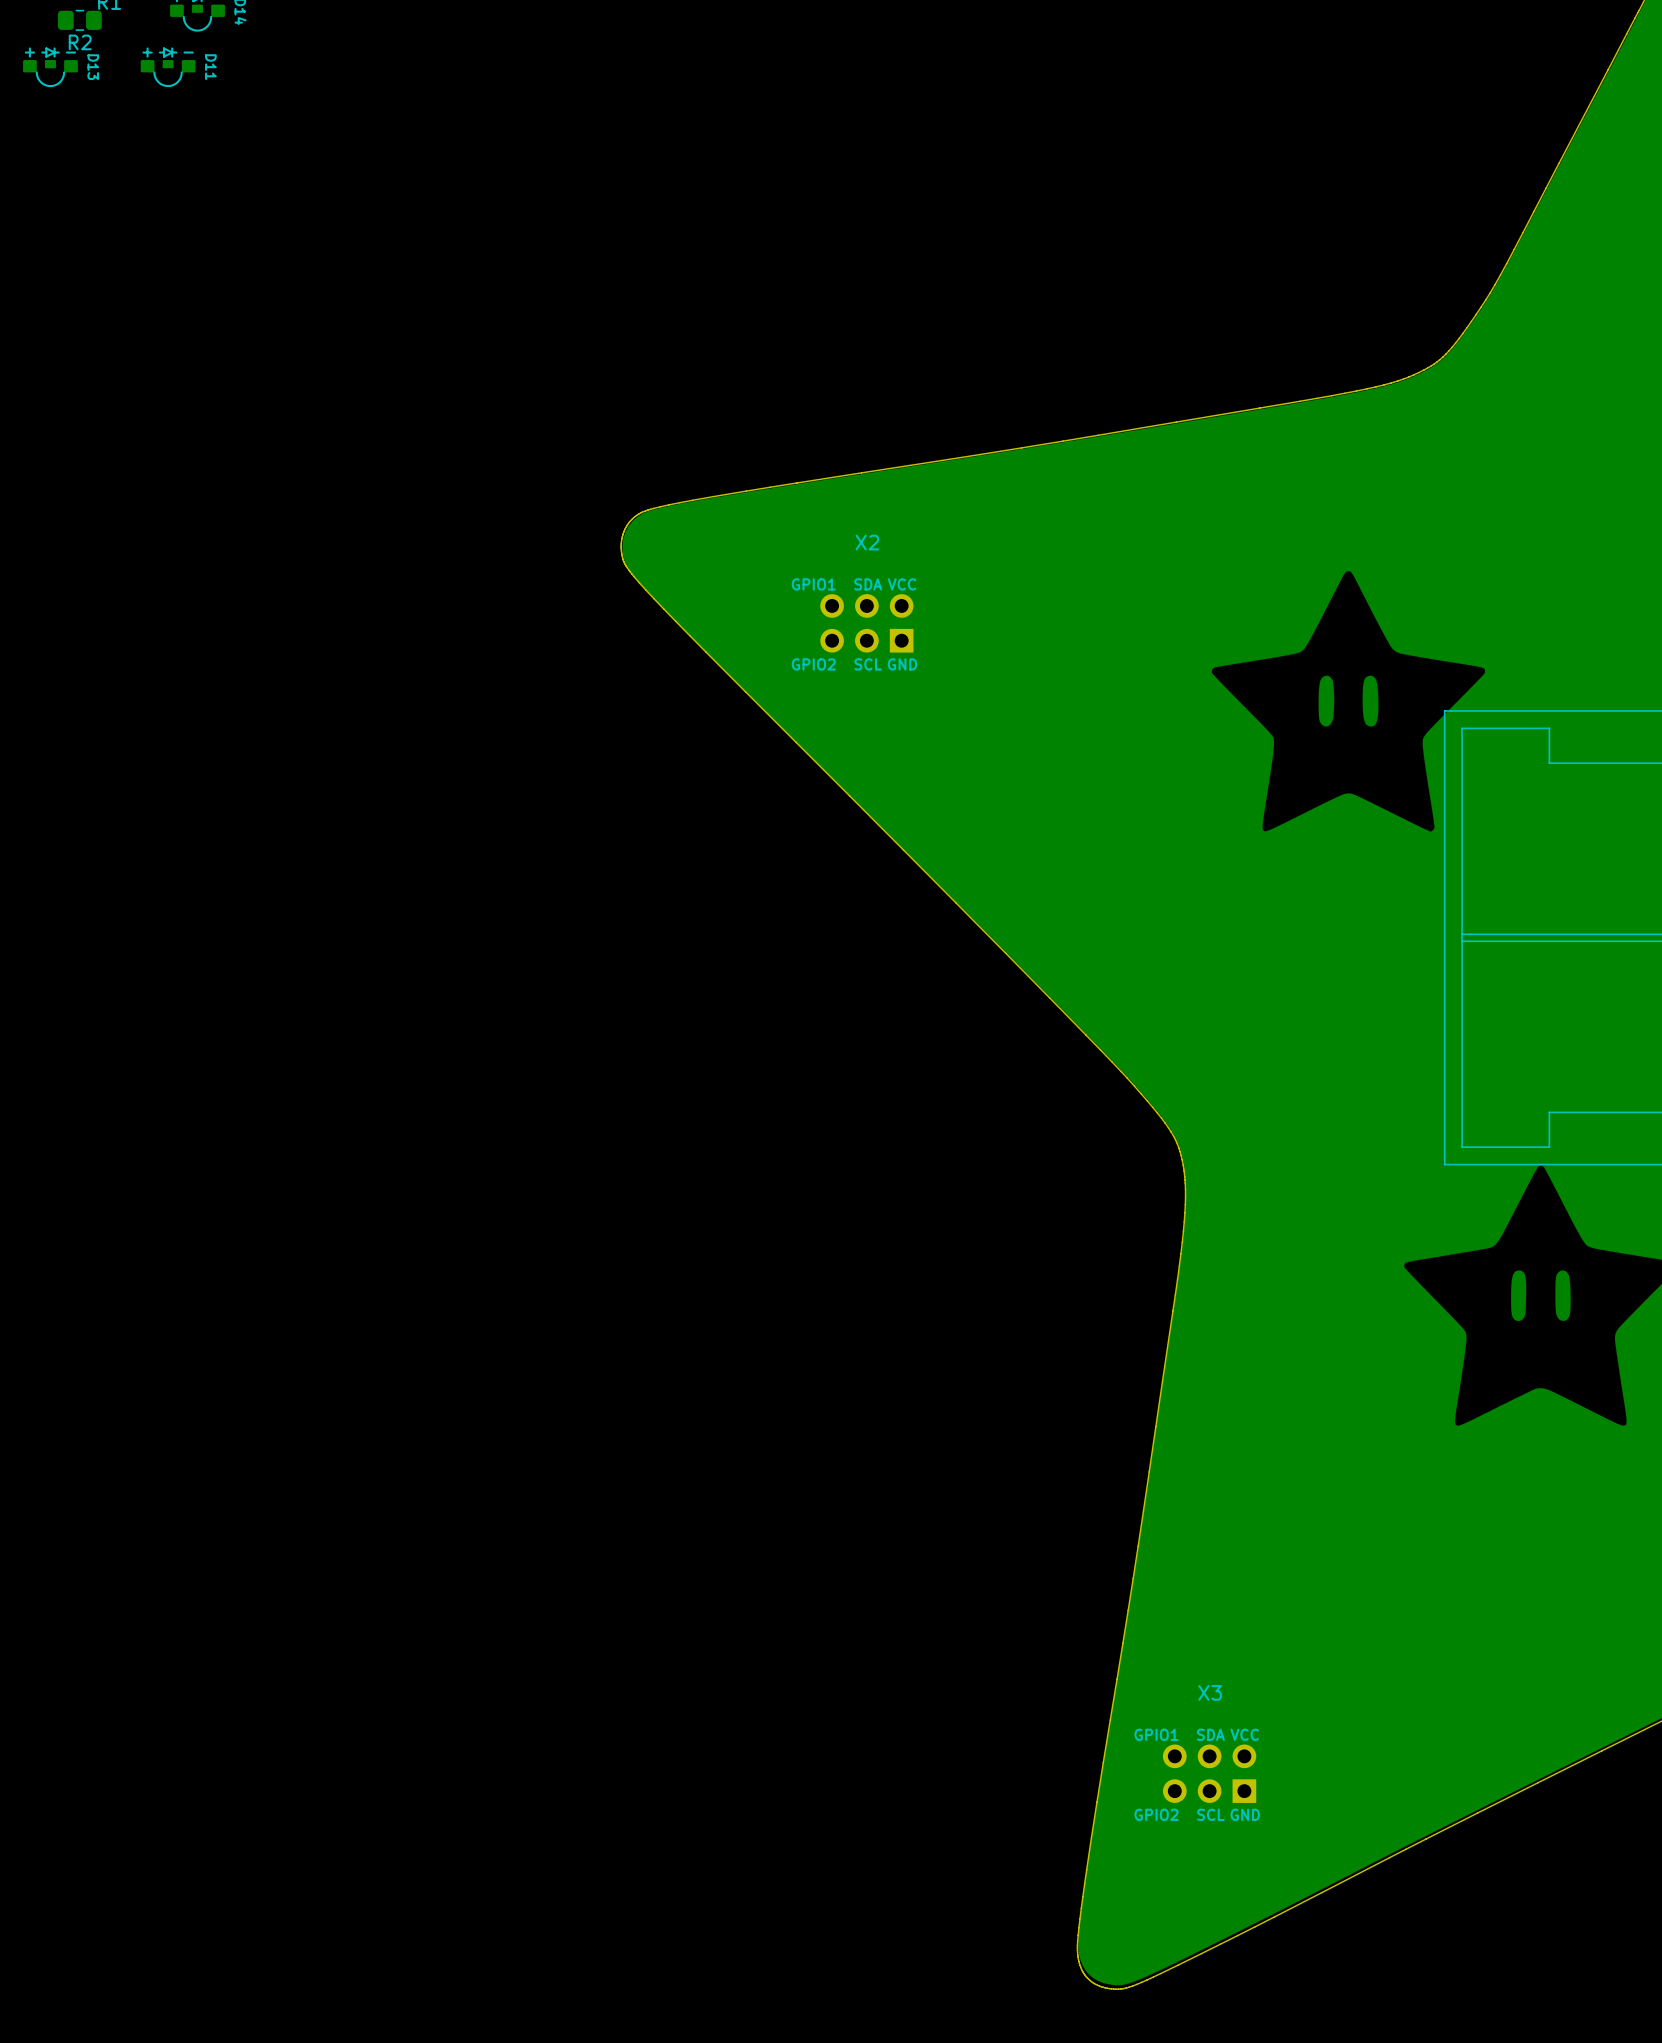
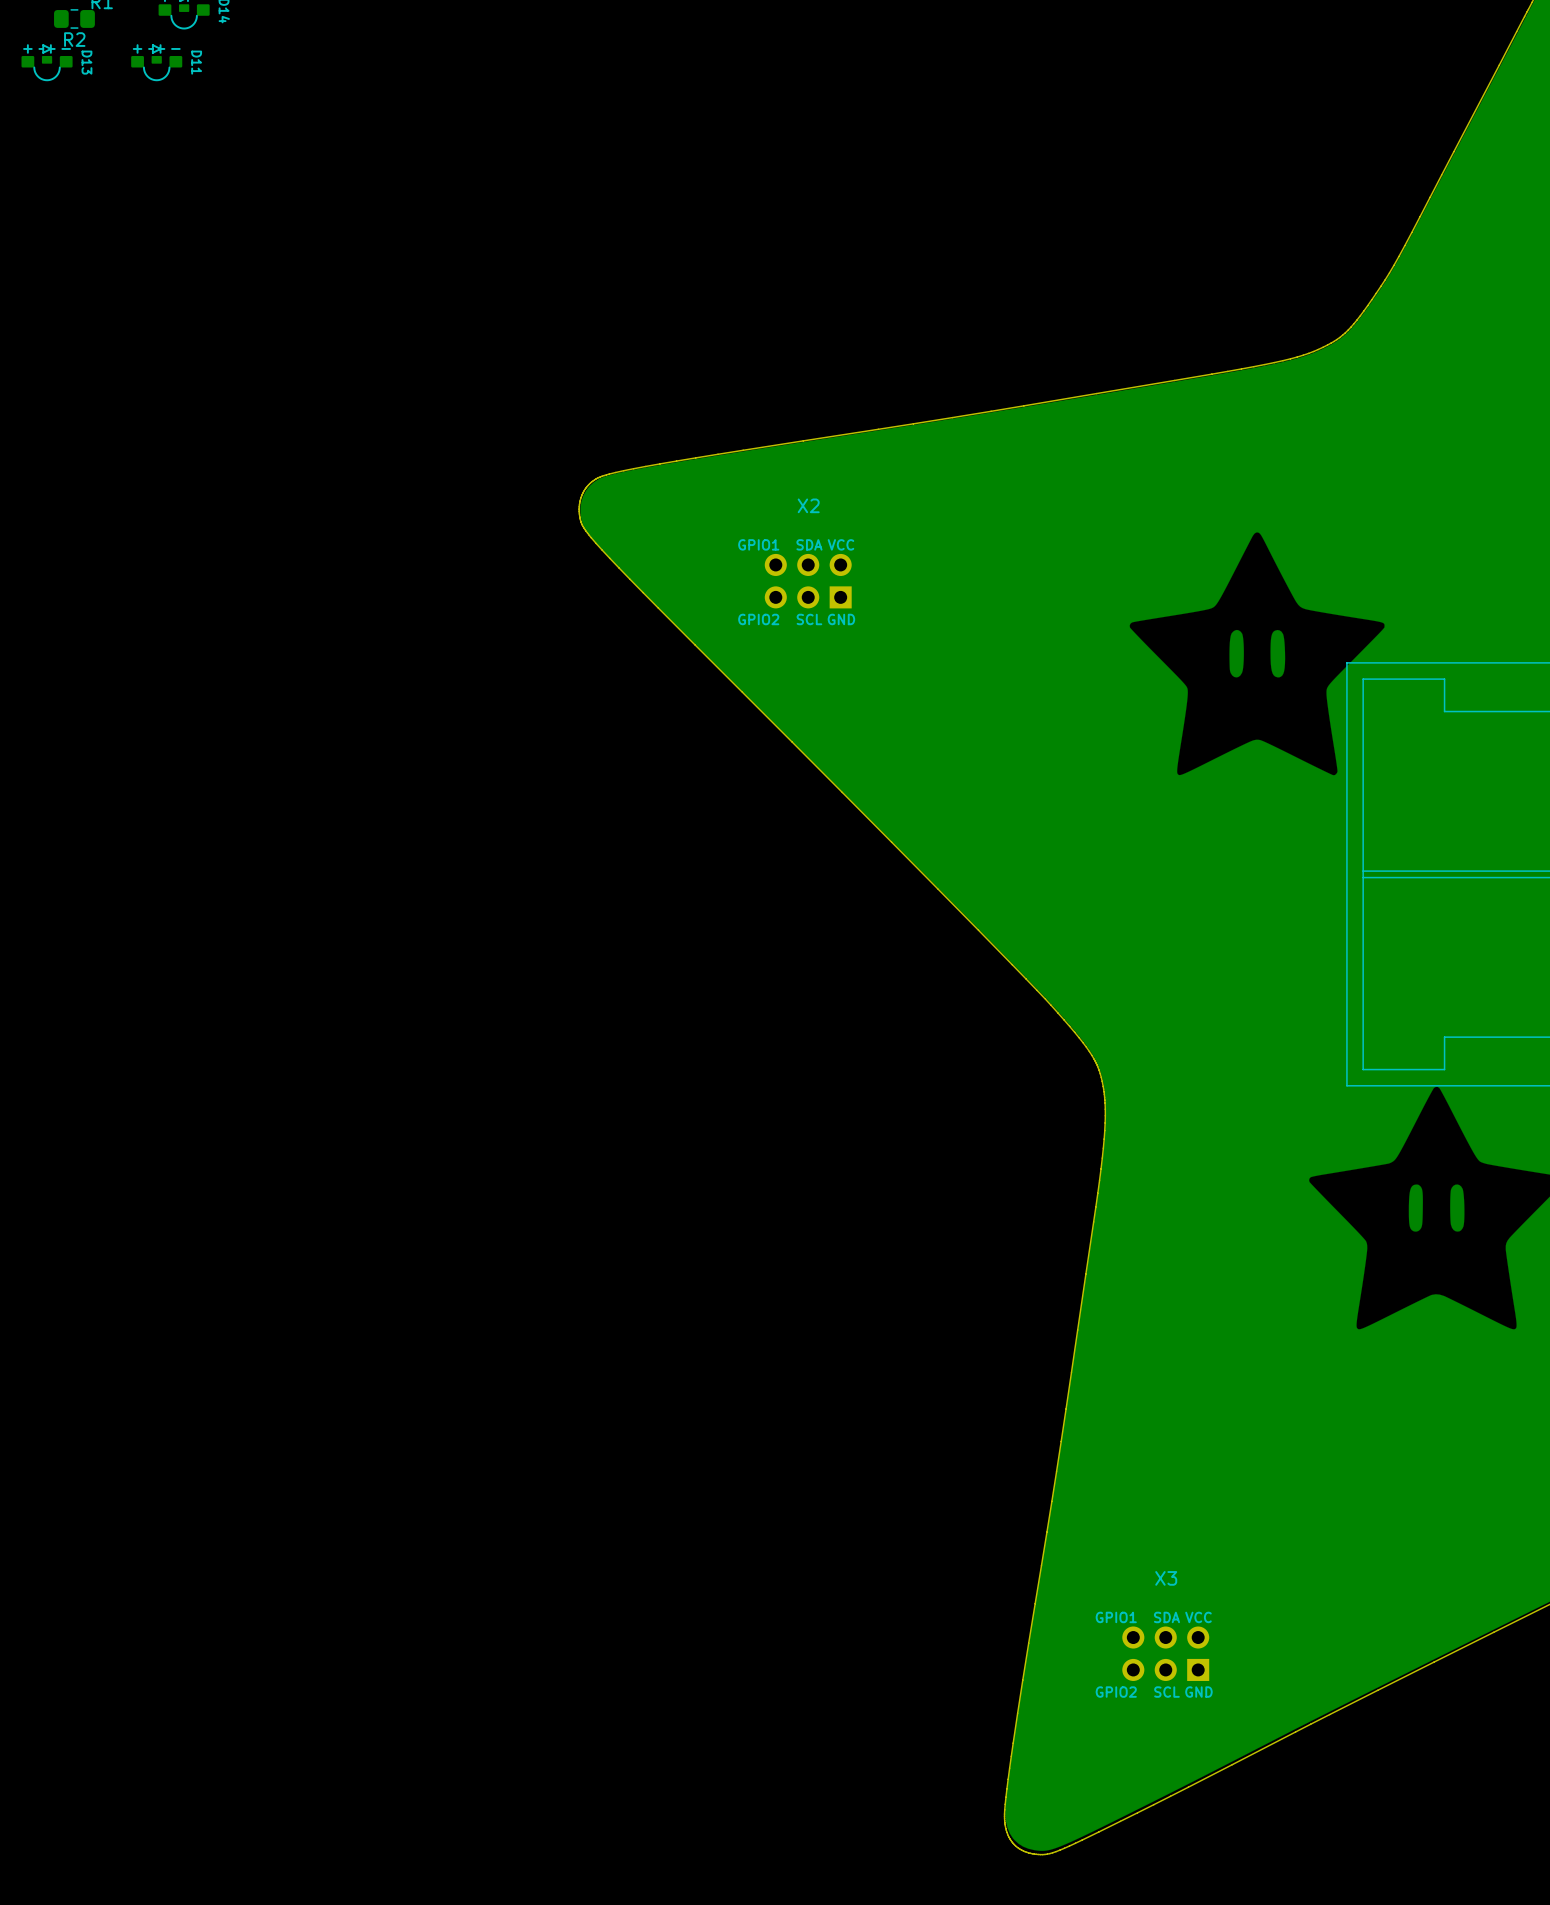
X3 position: (1209, 1773) -> (1165, 1653)

